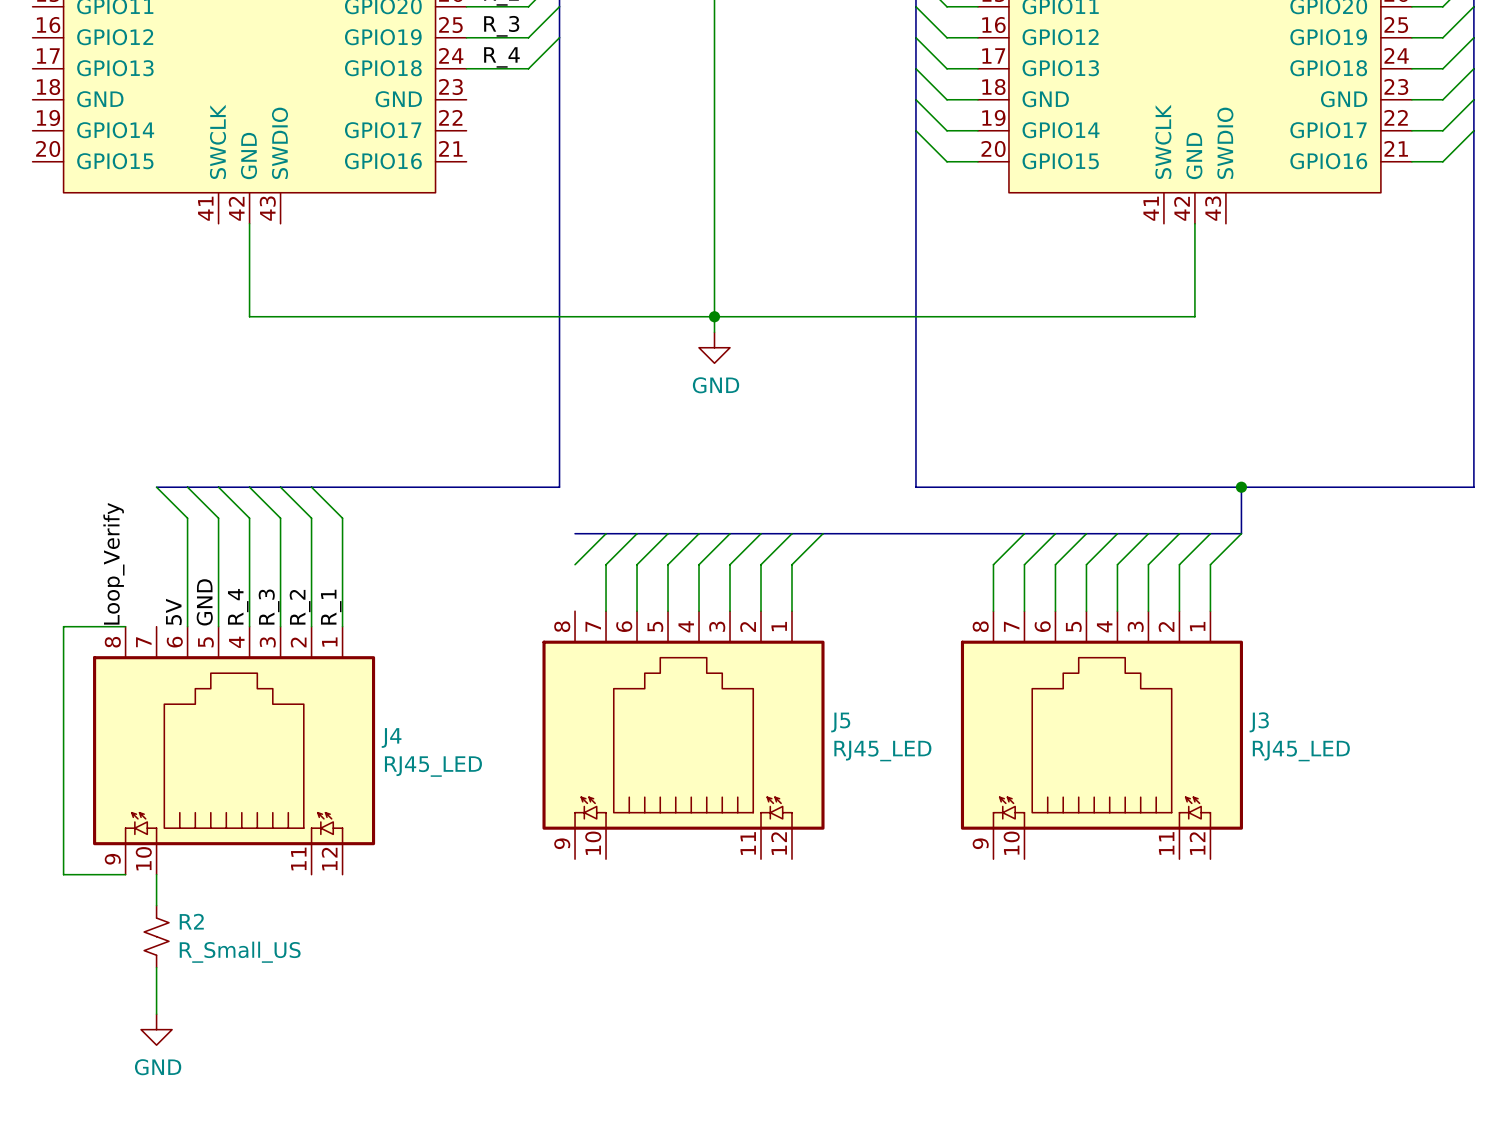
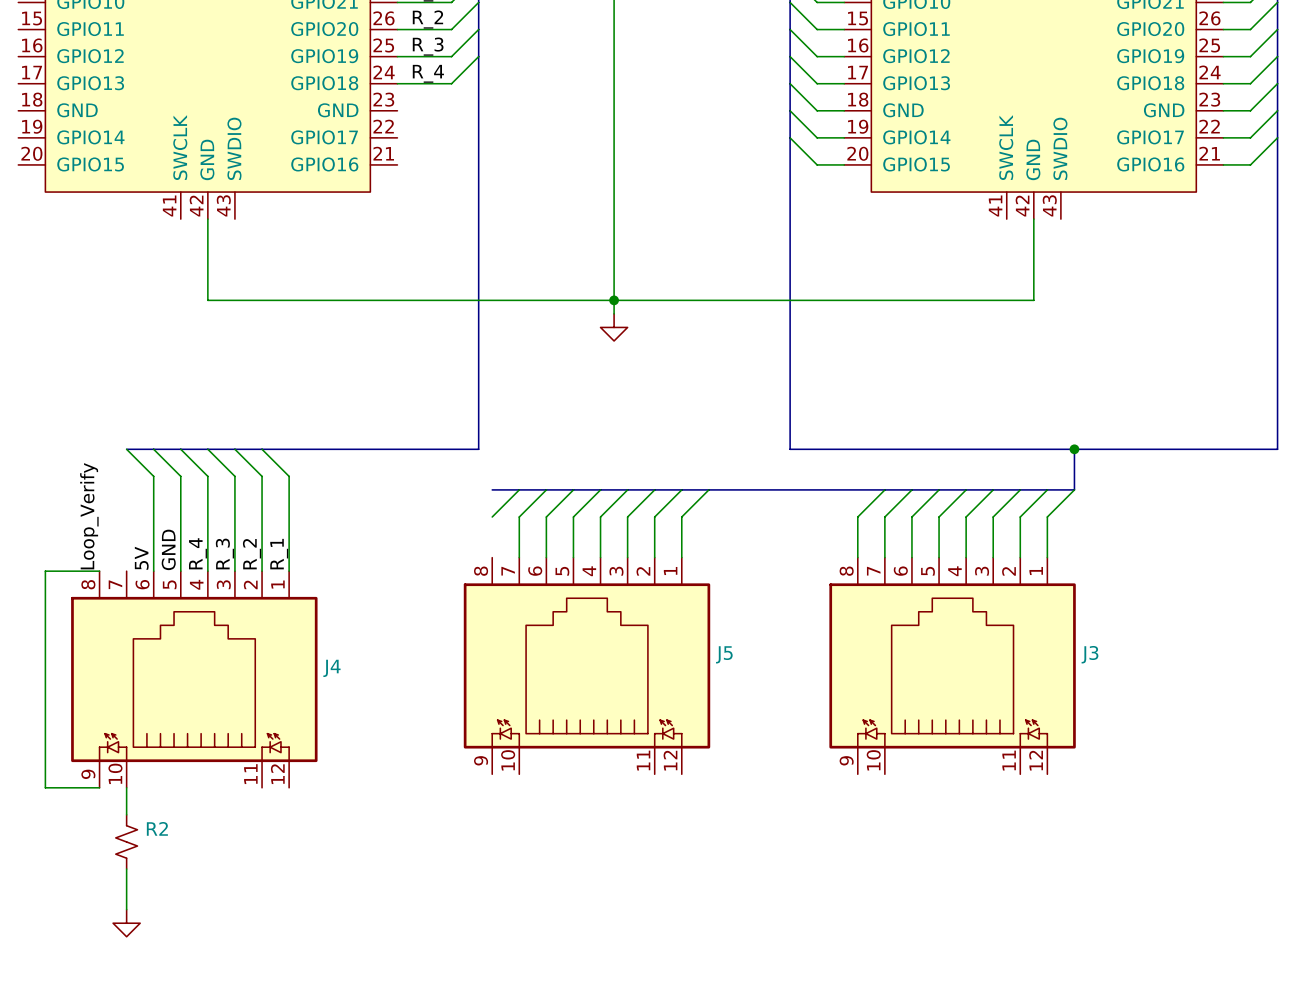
power symbol text: GND (716, 385) -> none
J5 value: RJ45_LED (882, 751) -> none
J3 value: RJ45_LED (1301, 751) -> none
J4 value: RJ45_LED (433, 766) -> none
R2 value: R_Small_US (240, 952) -> none
power symbol text: GND (158, 1067) -> none

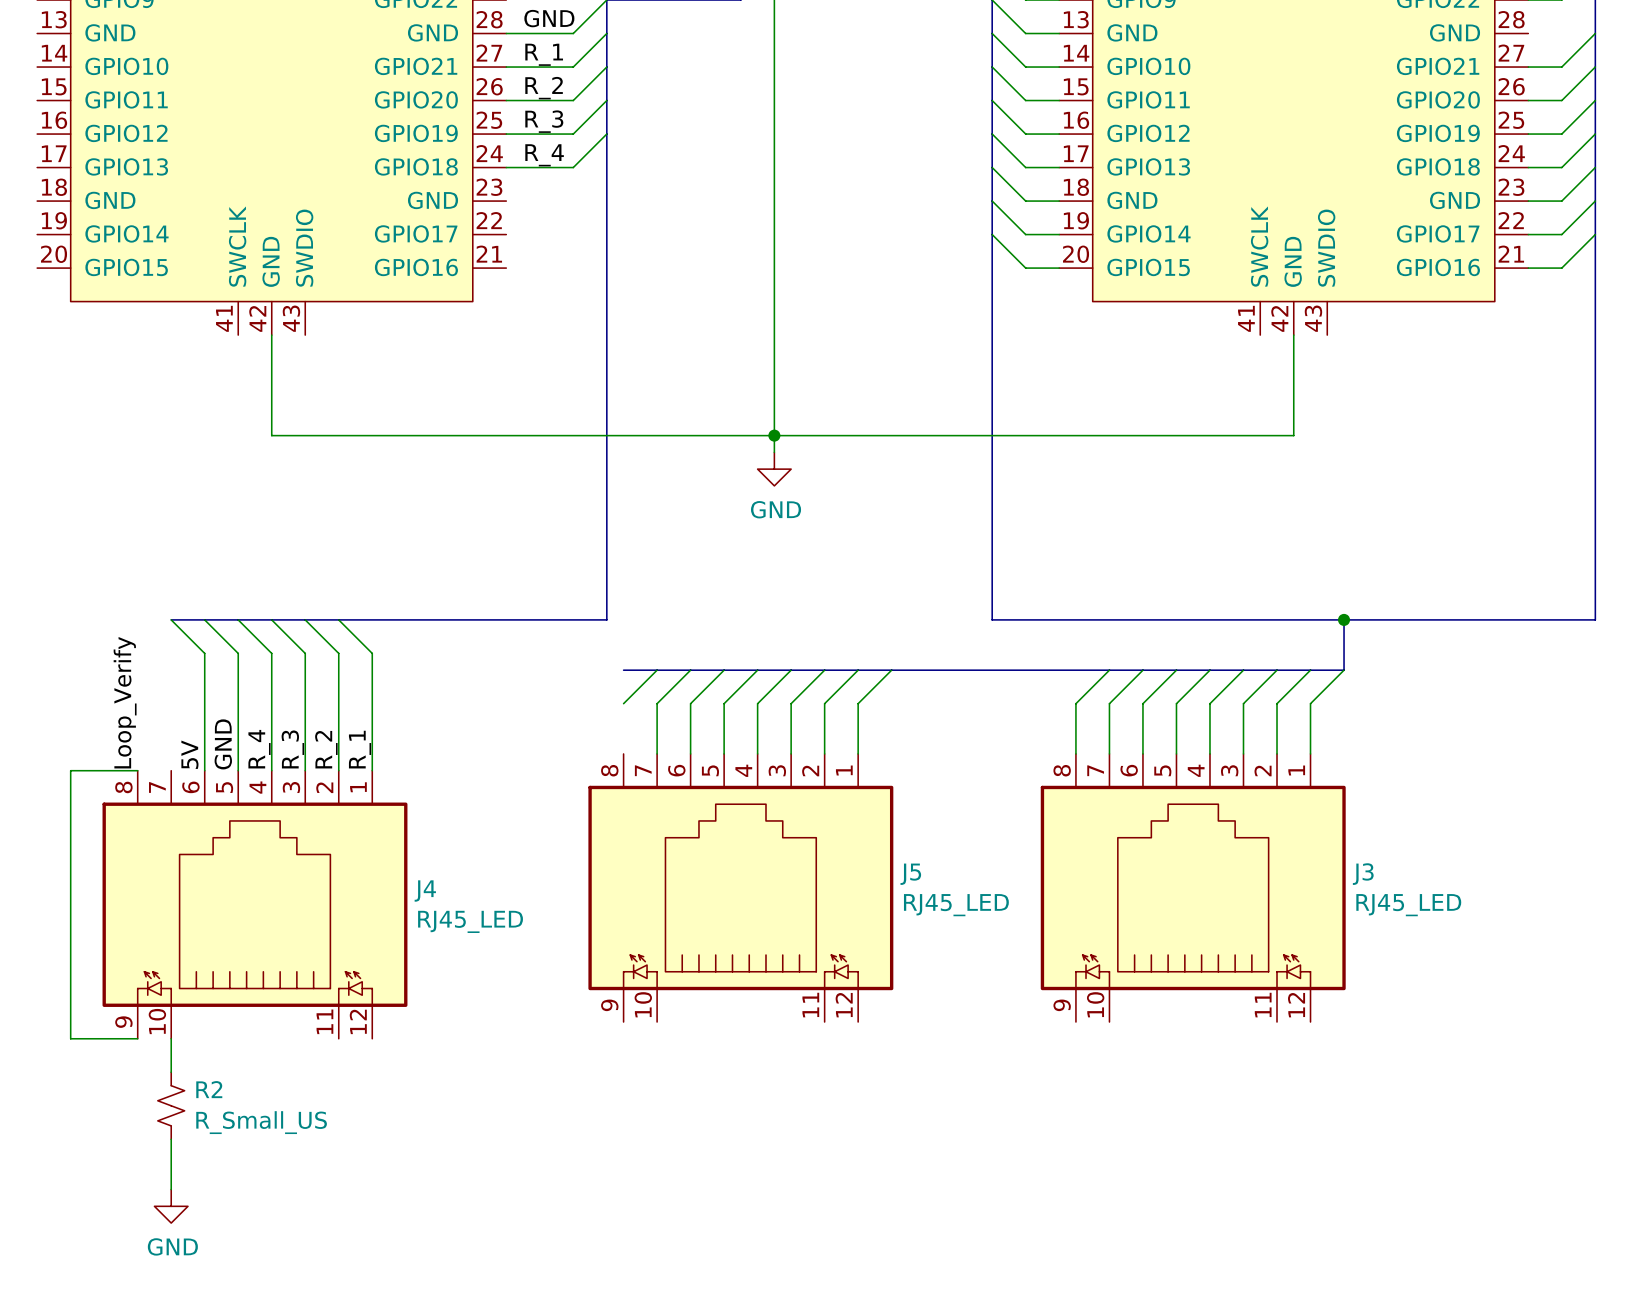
power symbol text: none -> GND (776, 509)
J5 value: none -> RJ45_LED (956, 905)
J3 value: none -> RJ45_LED (1408, 905)
J4 value: none -> RJ45_LED (470, 921)
R2 value: none -> R_Small_US (261, 1122)
power symbol text: none -> GND (172, 1246)

